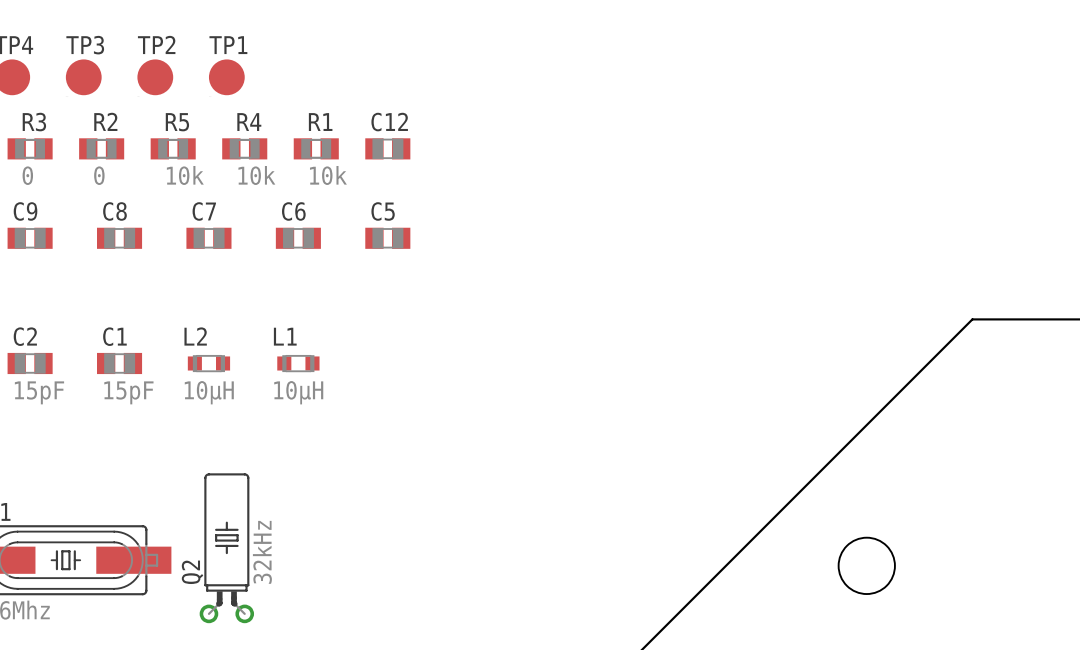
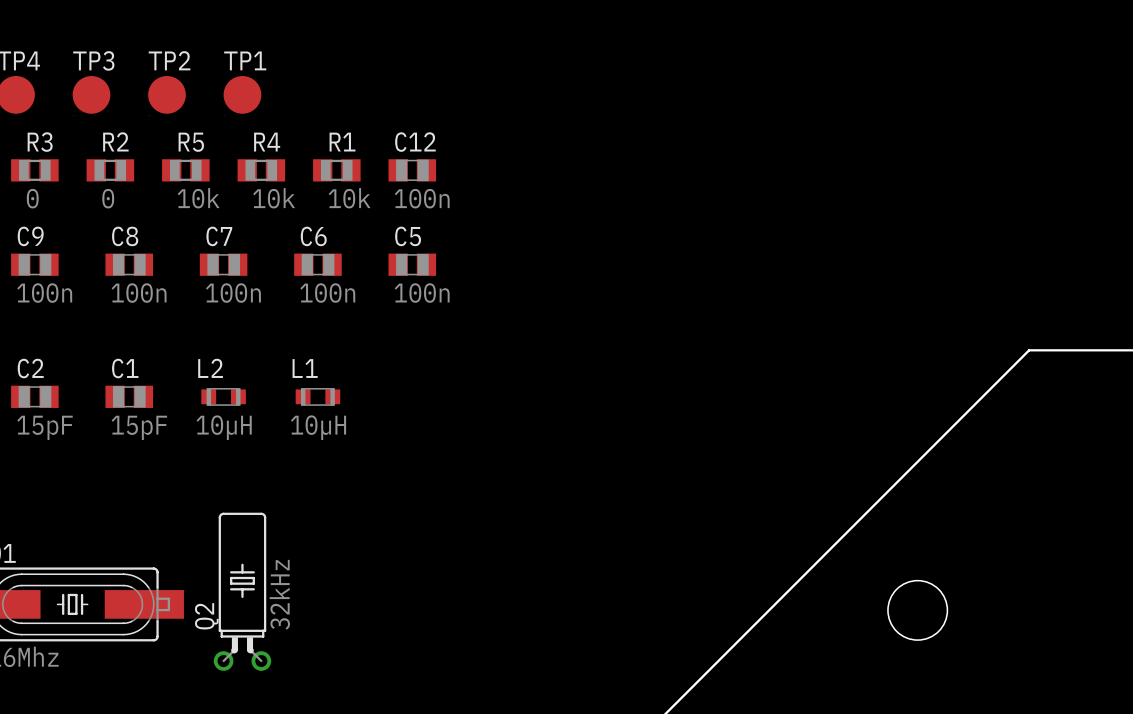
C12 value: none -> 100n (422, 198)
C9 value: none -> 100n (44, 293)
C8 value: none -> 100n (139, 293)
C7 value: none -> 100n (233, 293)
C6 value: none -> 100n (327, 293)
C5 value: none -> 100n (422, 293)

